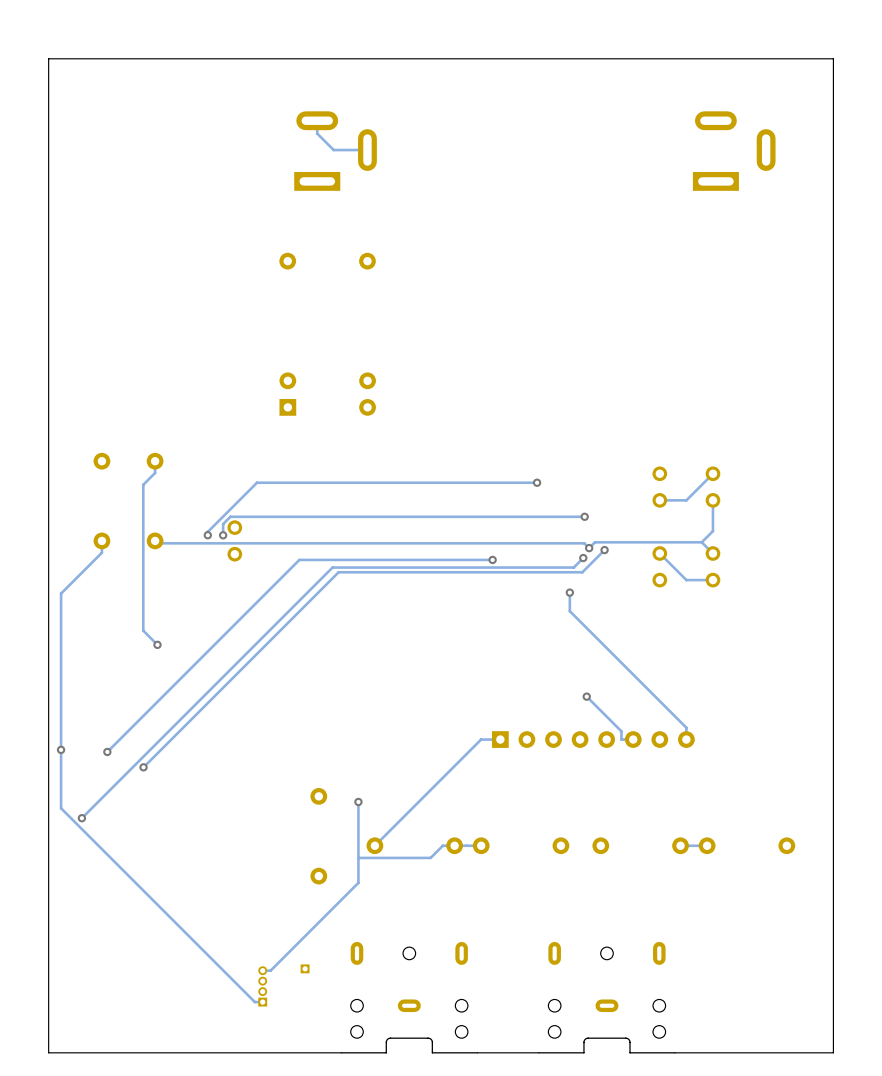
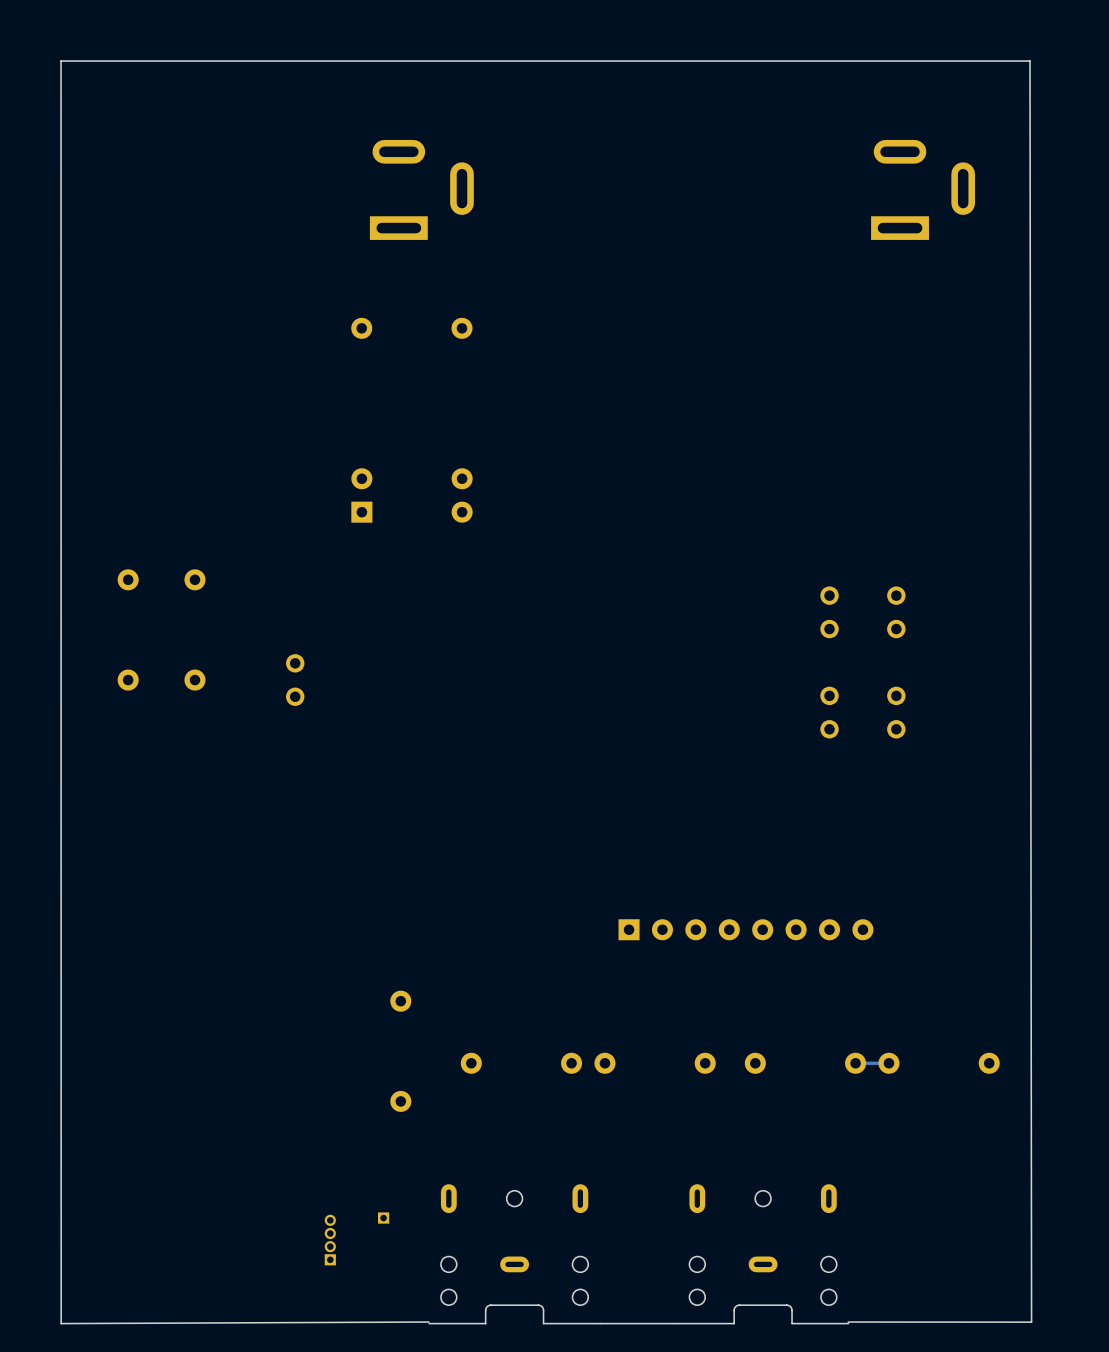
track: (317, 120) (317, 133) (333, 150) (367, 150) -> none
track: (155, 461) (155, 472) (143, 484) (143, 630) (157, 644) -> none
track: (712, 473) (686, 500) (659, 500) -> none
track: (537, 482) (256, 482) (207, 531) (207, 535) -> none
via: (537, 482) -> none
track: (712, 500) (712, 531) (701, 542) -> none
track: (584, 516) (230, 516) (223, 524) (223, 535) -> none
via: (584, 516) -> none
via: (207, 535) -> none
via: (223, 535) -> none
track: (101, 540) (101, 552) (61, 593) (61, 808) (254, 1002) (262, 1002) -> none
track: (155, 540) (157, 543) (584, 543) (589, 548) (594, 542) (701, 542) -> none
track: (701, 542) (712, 553) -> none
via: (589, 548) -> none
track: (604, 550) (582, 572) (338, 572) (143, 767) -> none
via: (604, 550) -> none
track: (659, 553) (686, 580) (712, 580) -> none
track: (583, 558) (573, 567) (332, 567) (81, 818) -> none
via: (583, 558) -> none
track: (492, 559) (299, 559) (107, 751) -> none
via: (492, 559) -> none
track: (569, 592) (569, 611) (686, 727) (686, 739) -> none
via: (569, 592) -> none
via: (157, 644) -> none
track: (586, 696) (621, 731) (621, 739) (633, 739) -> none
via: (586, 696) -> none
track: (500, 739) (481, 739) (374, 845) -> none
via: (61, 749) -> none
via: (107, 751) -> none
via: (143, 767) -> none
track: (358, 801) (358, 882) (270, 970) (262, 970) -> none
via: (358, 801) -> none
via: (81, 818) -> none
track: (481, 845) (442, 845) (430, 857) (358, 857) -> none
board edge: none -> (848, 1322) (1031, 1322) (1029, 61) (61, 61) (61, 1323) (428, 1322)
board edge: (674, 1052) (833, 1052) (833, 58) (48, 58) (48, 1052) (341, 1052) -> none

